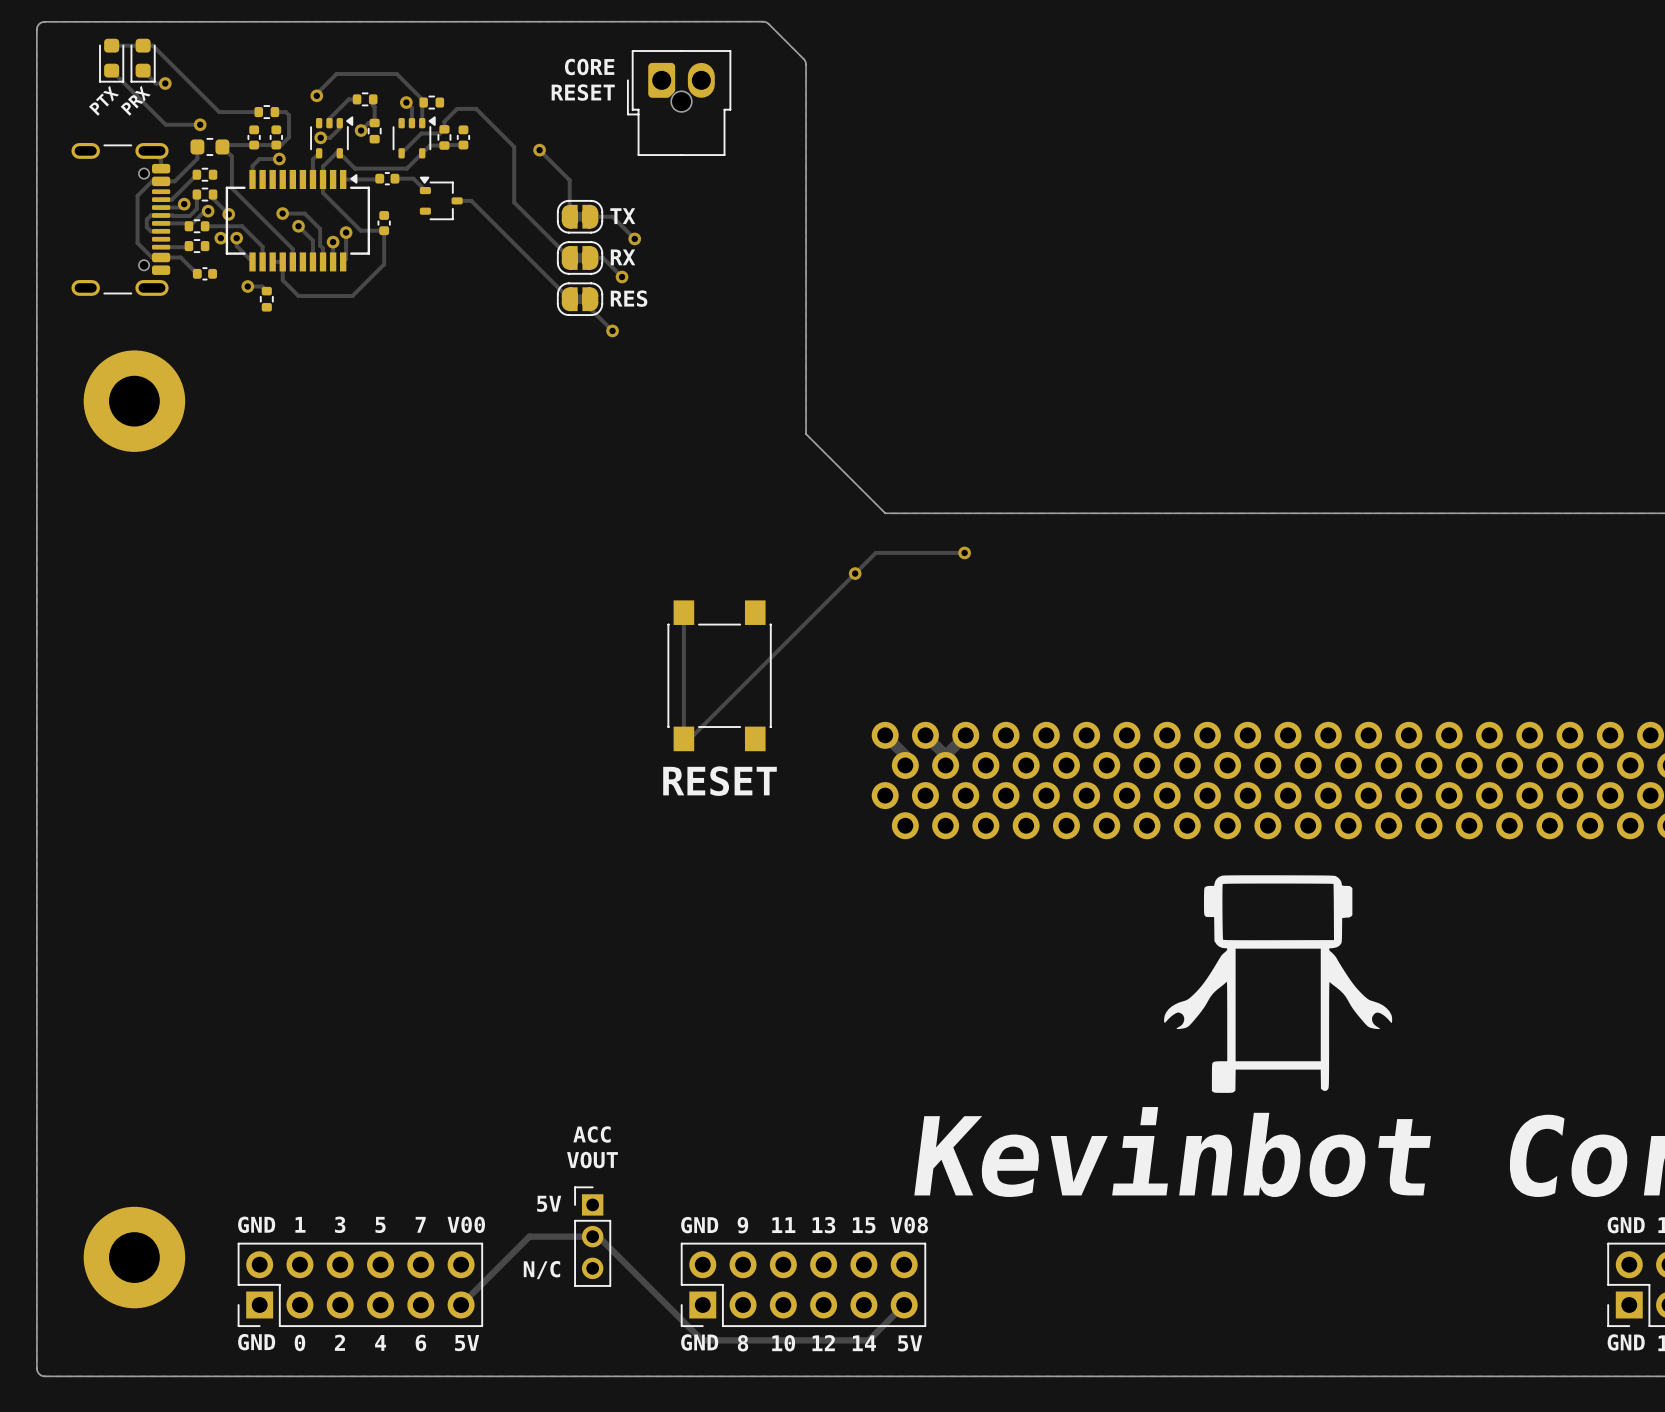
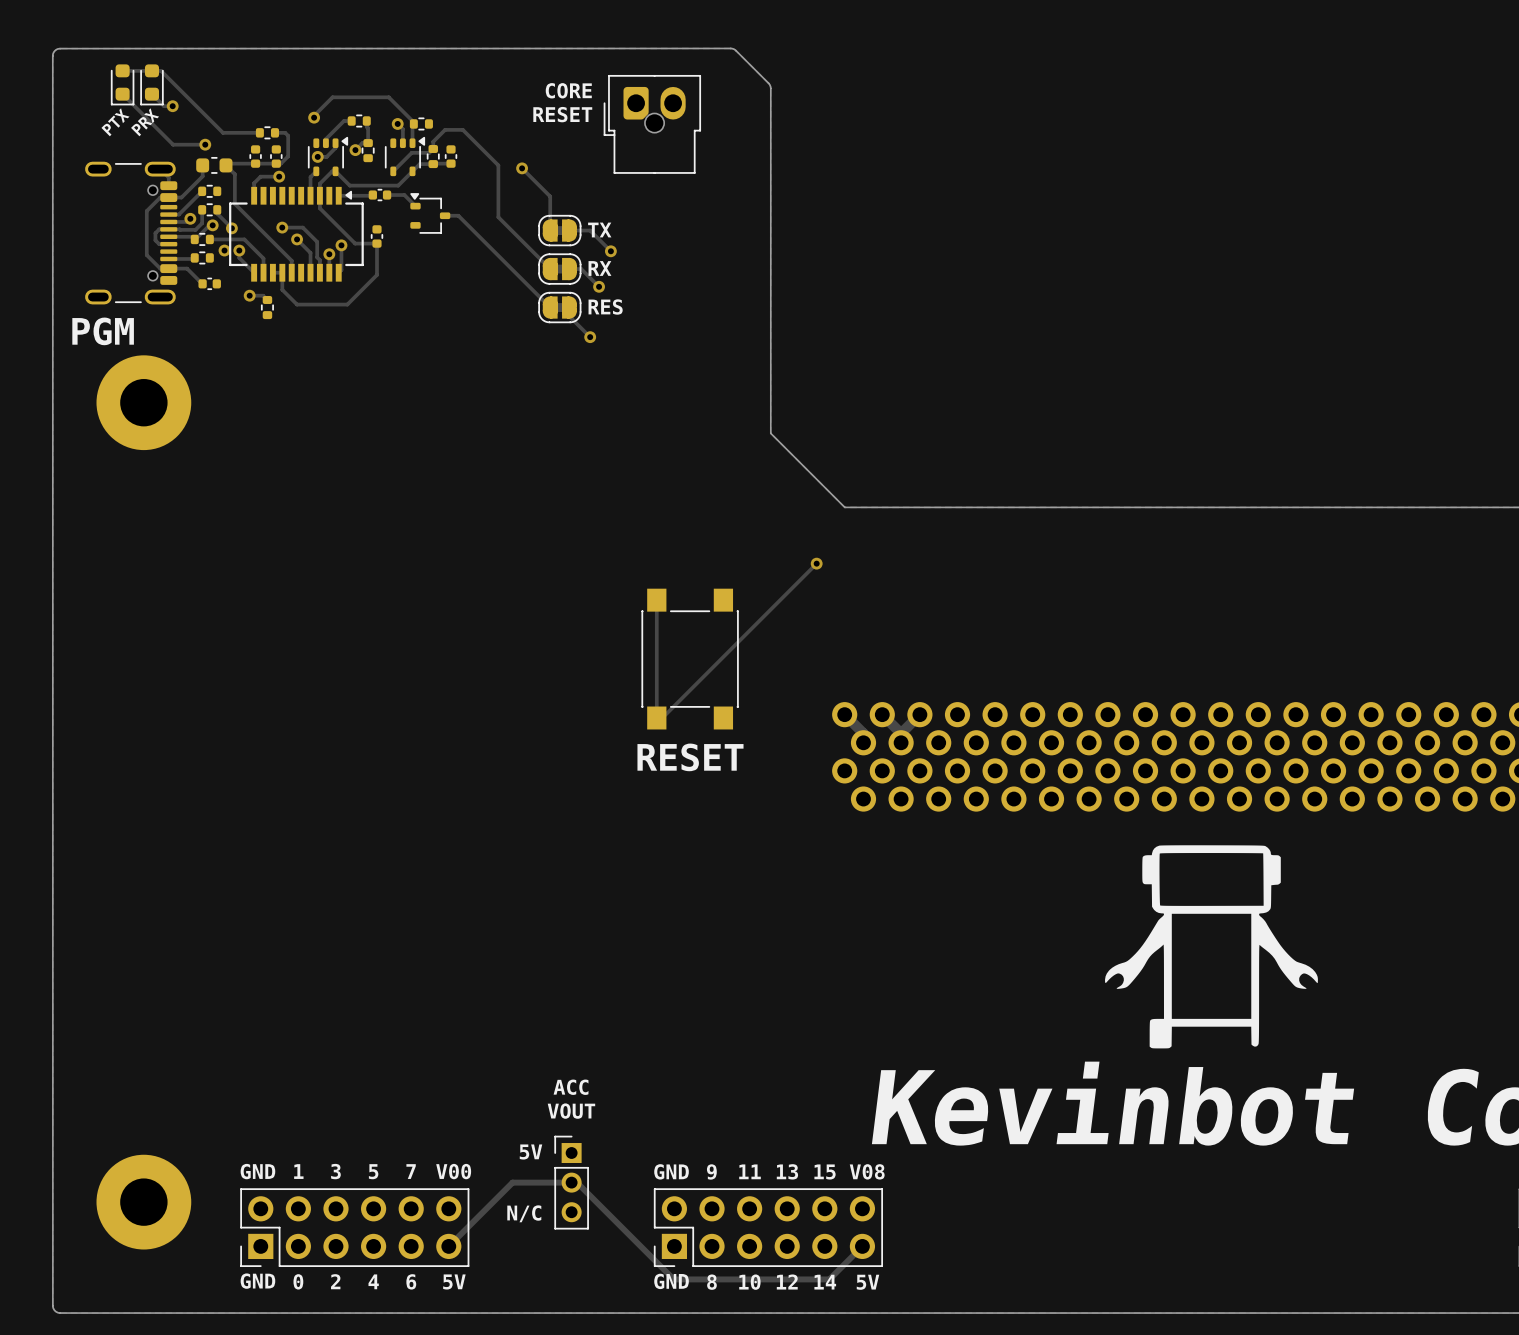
text: none -> PGM (103, 331)
track: (964, 552) (875, 552) (855, 573) -> none
via: (964, 552) -> none

